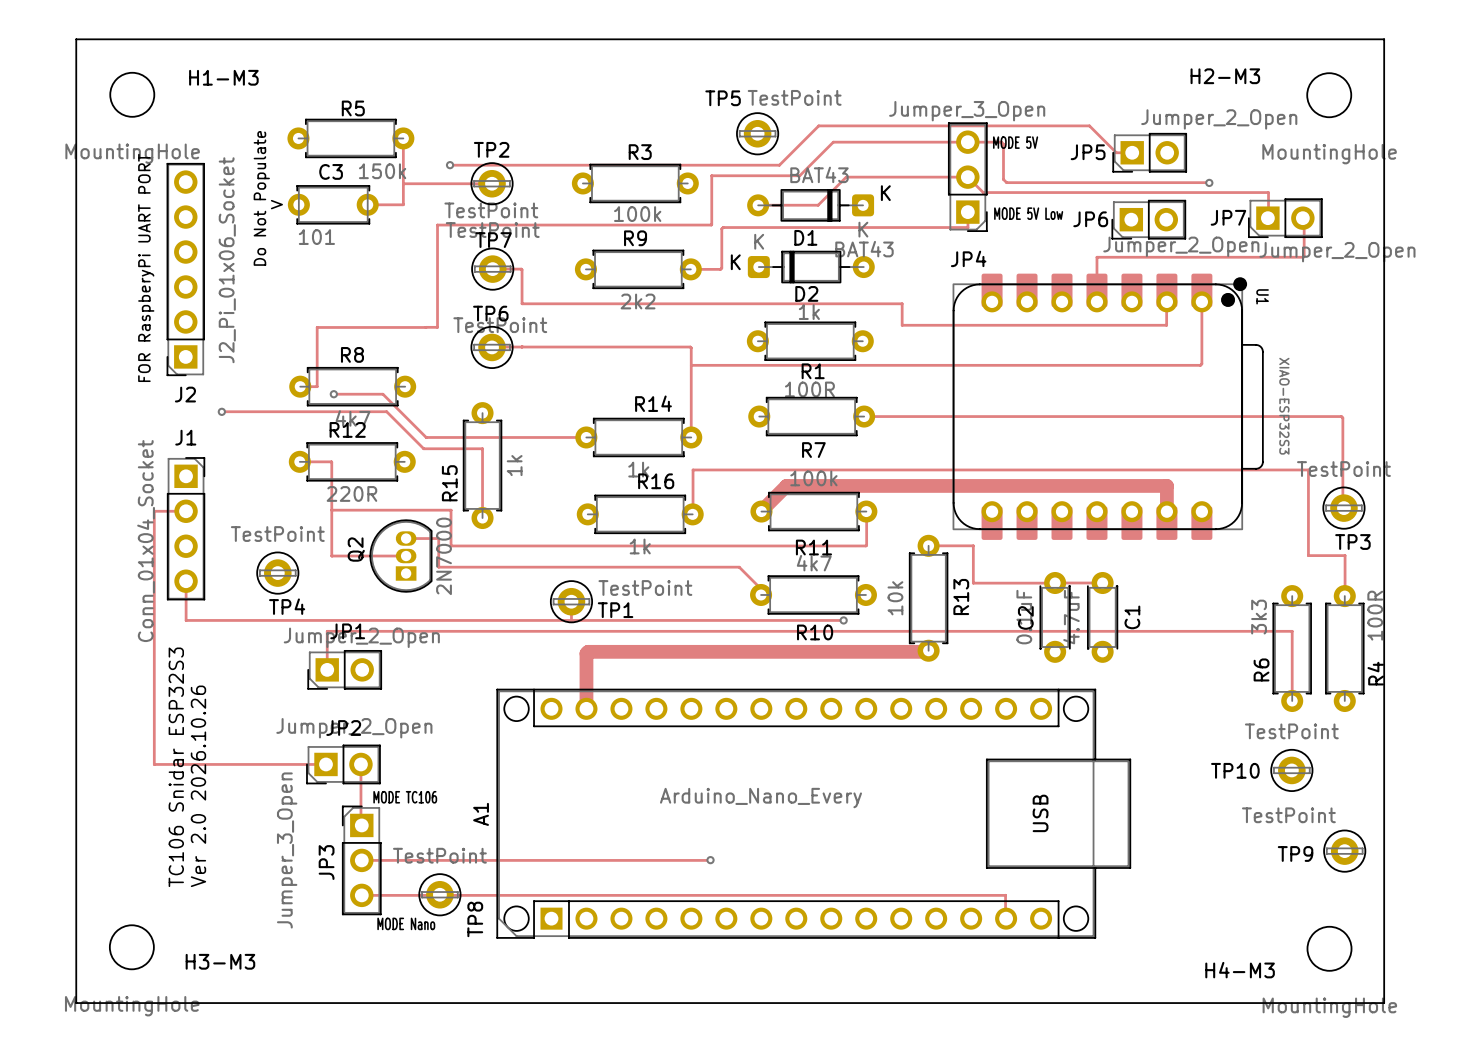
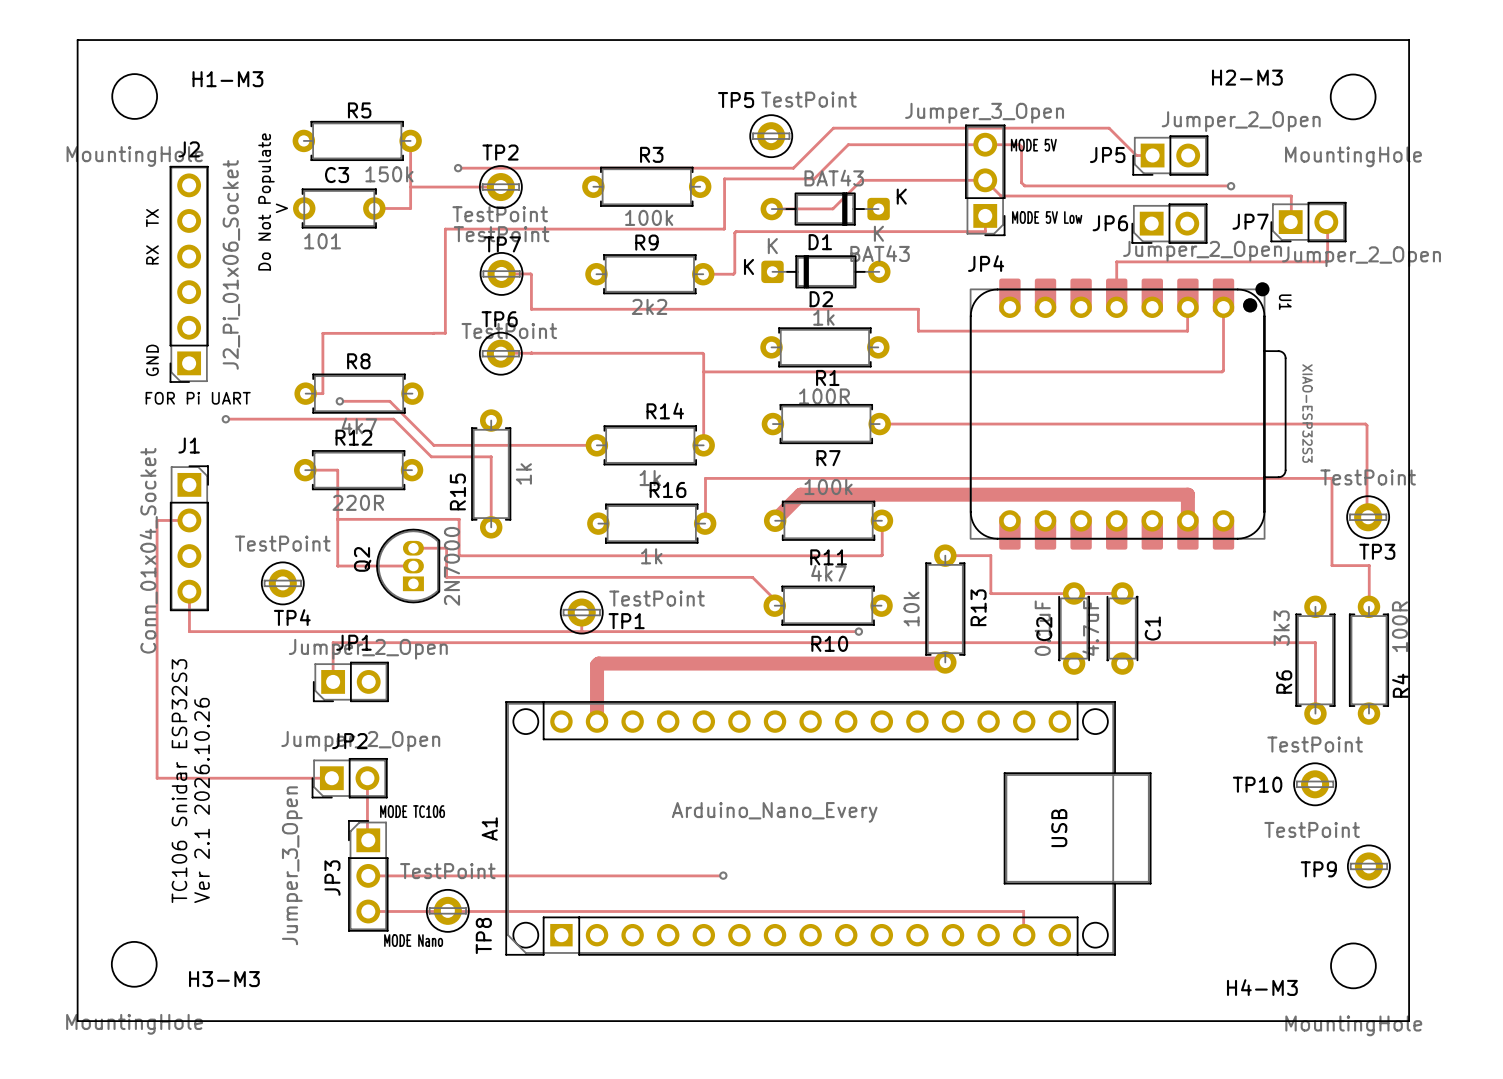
text: FOR RaspberyPi UART PORT (146, 267) -> FOR Pi UART (198, 398)
text: none -> GND RX TX (152, 292)
J2 name position: J2 (185, 394) -> J2 (189, 149)
text: Ver 2.0 2026.10.26 (198, 786) -> Ver 2.1 2026.10.26 (202, 800)

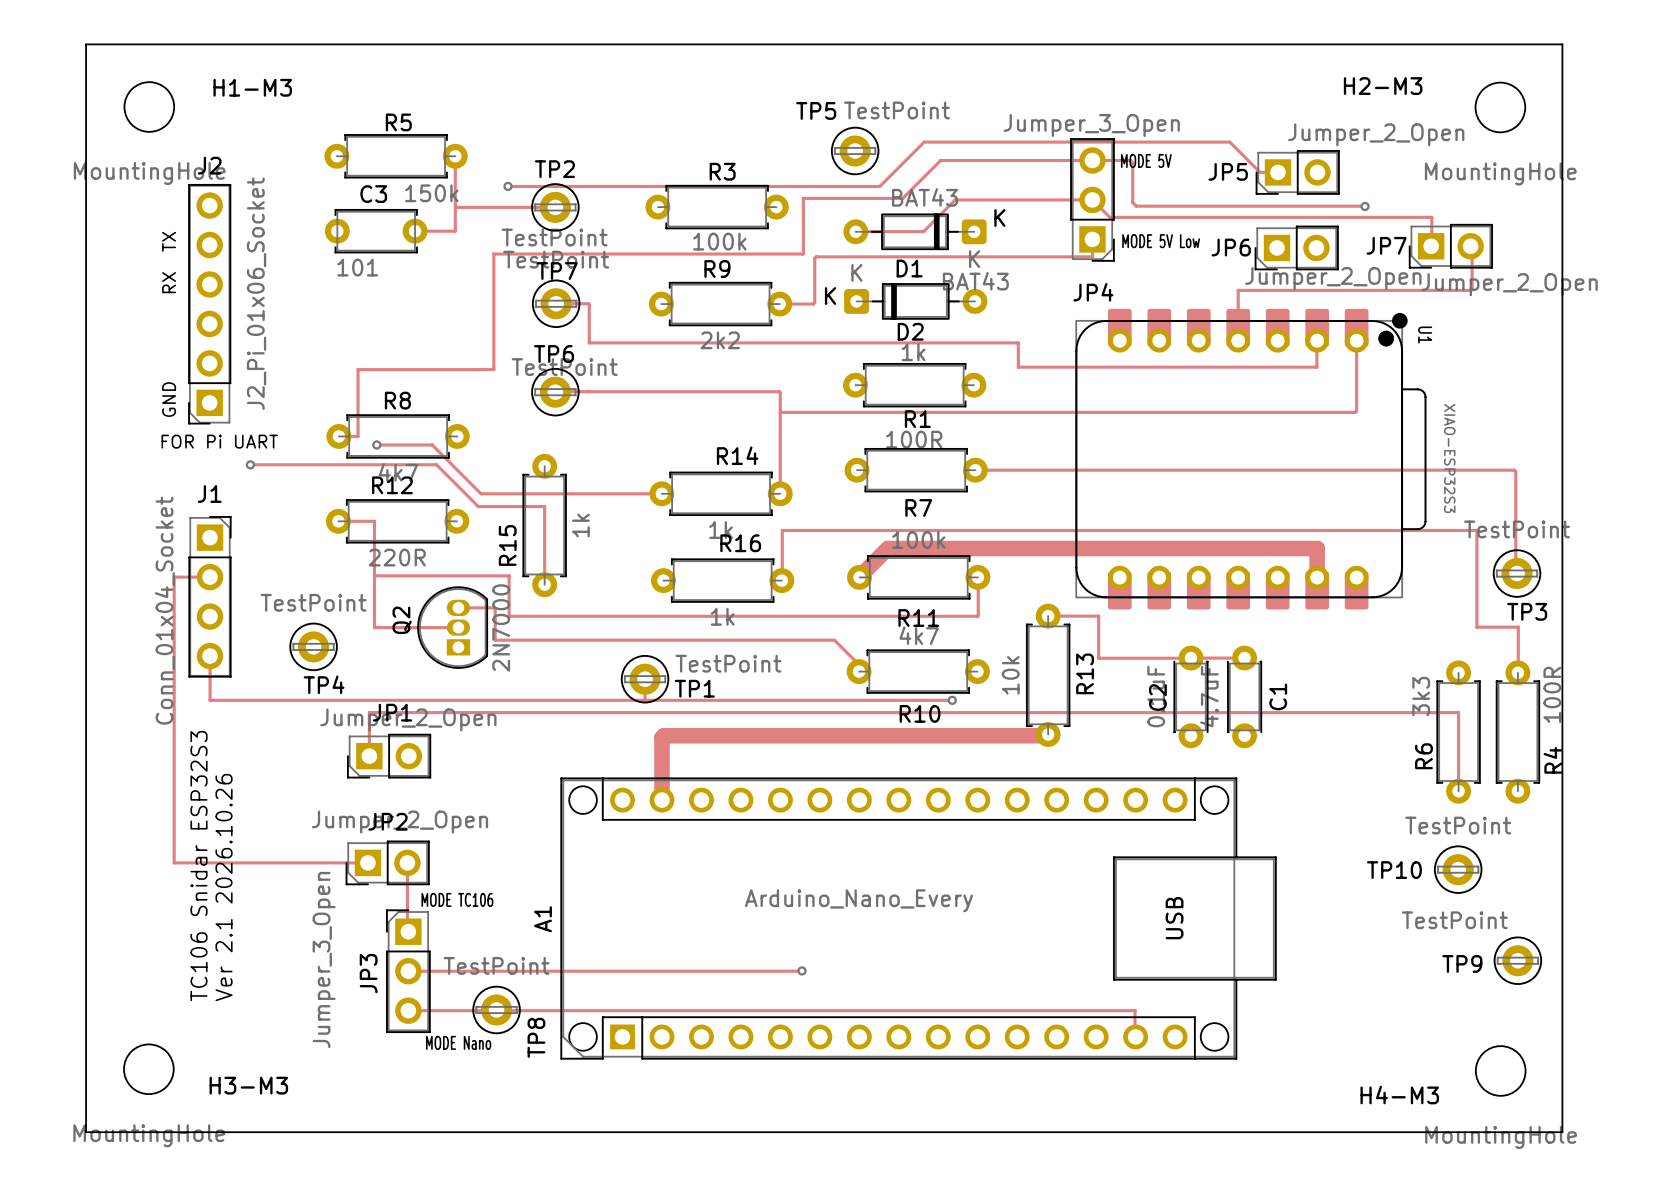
text: Do Not Populate (266, 201) -> none
text: > (281, 208) -> none

